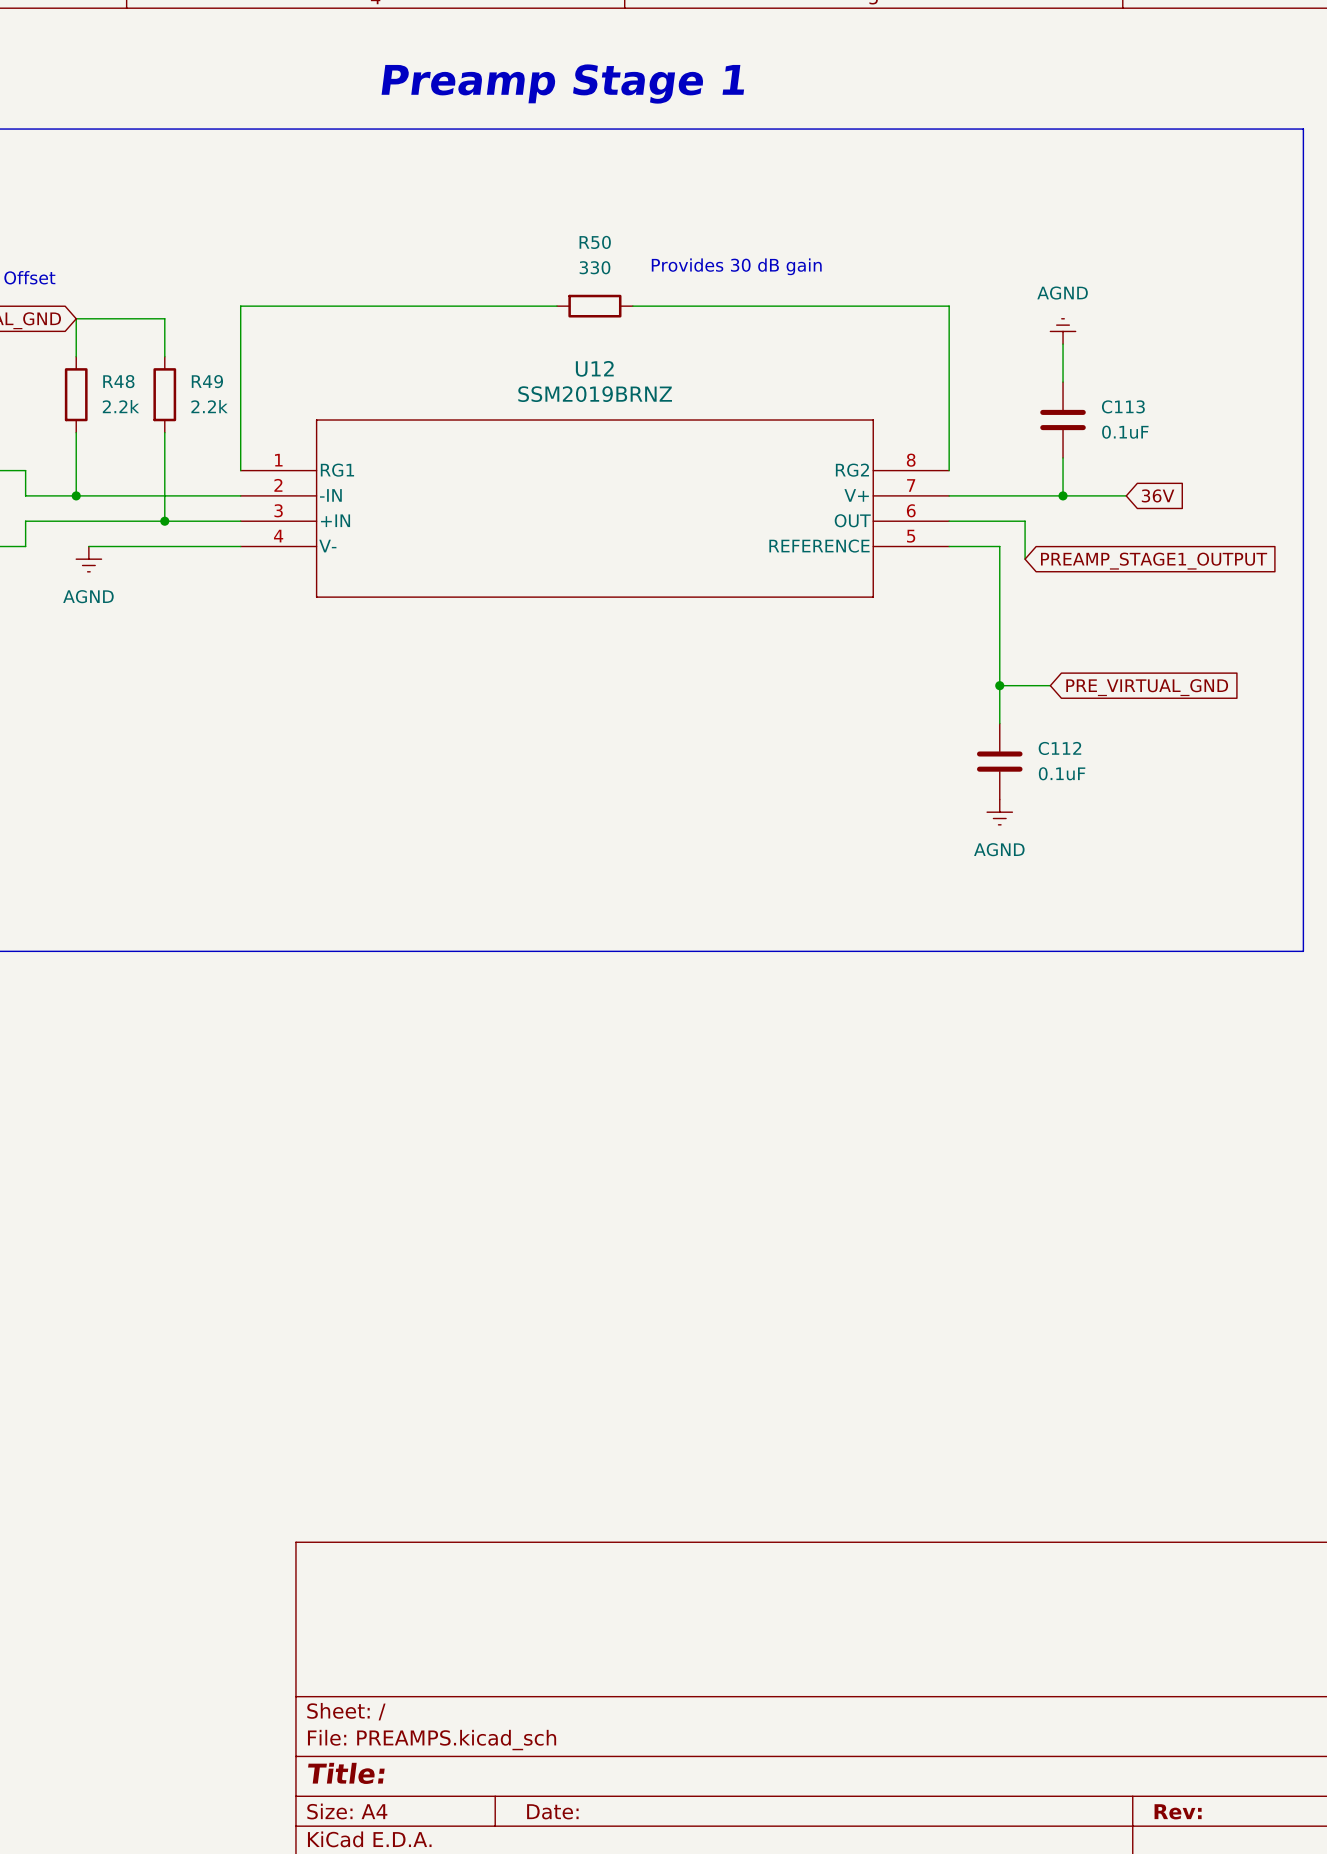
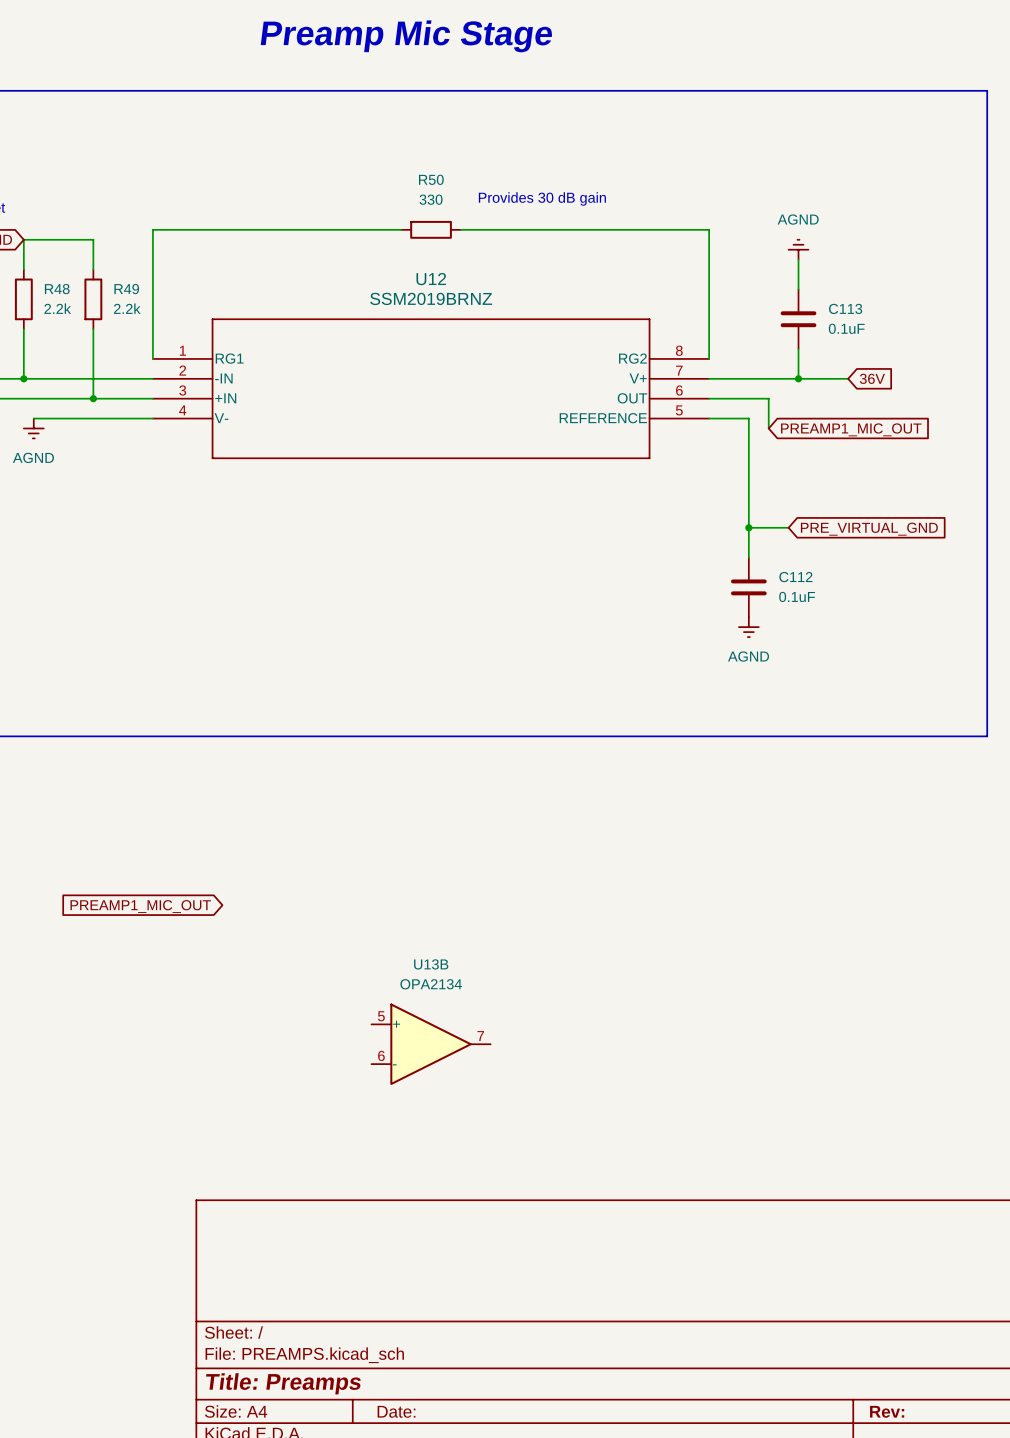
text: Preamp Stage 1 (562, 84) -> Preamp Mic Stage (406, 36)
global label: PREAMP_STAGE1_OUTPUT (1154, 561) -> PREAMP1_MIC_OUT (851, 429)
global label: none -> PREAMP1_MIC_OUT (140, 906)
U13B: none -> OPA2134 (431, 1044)
title block: Title: (346, 1773) -> Title: Preamps (283, 1383)

